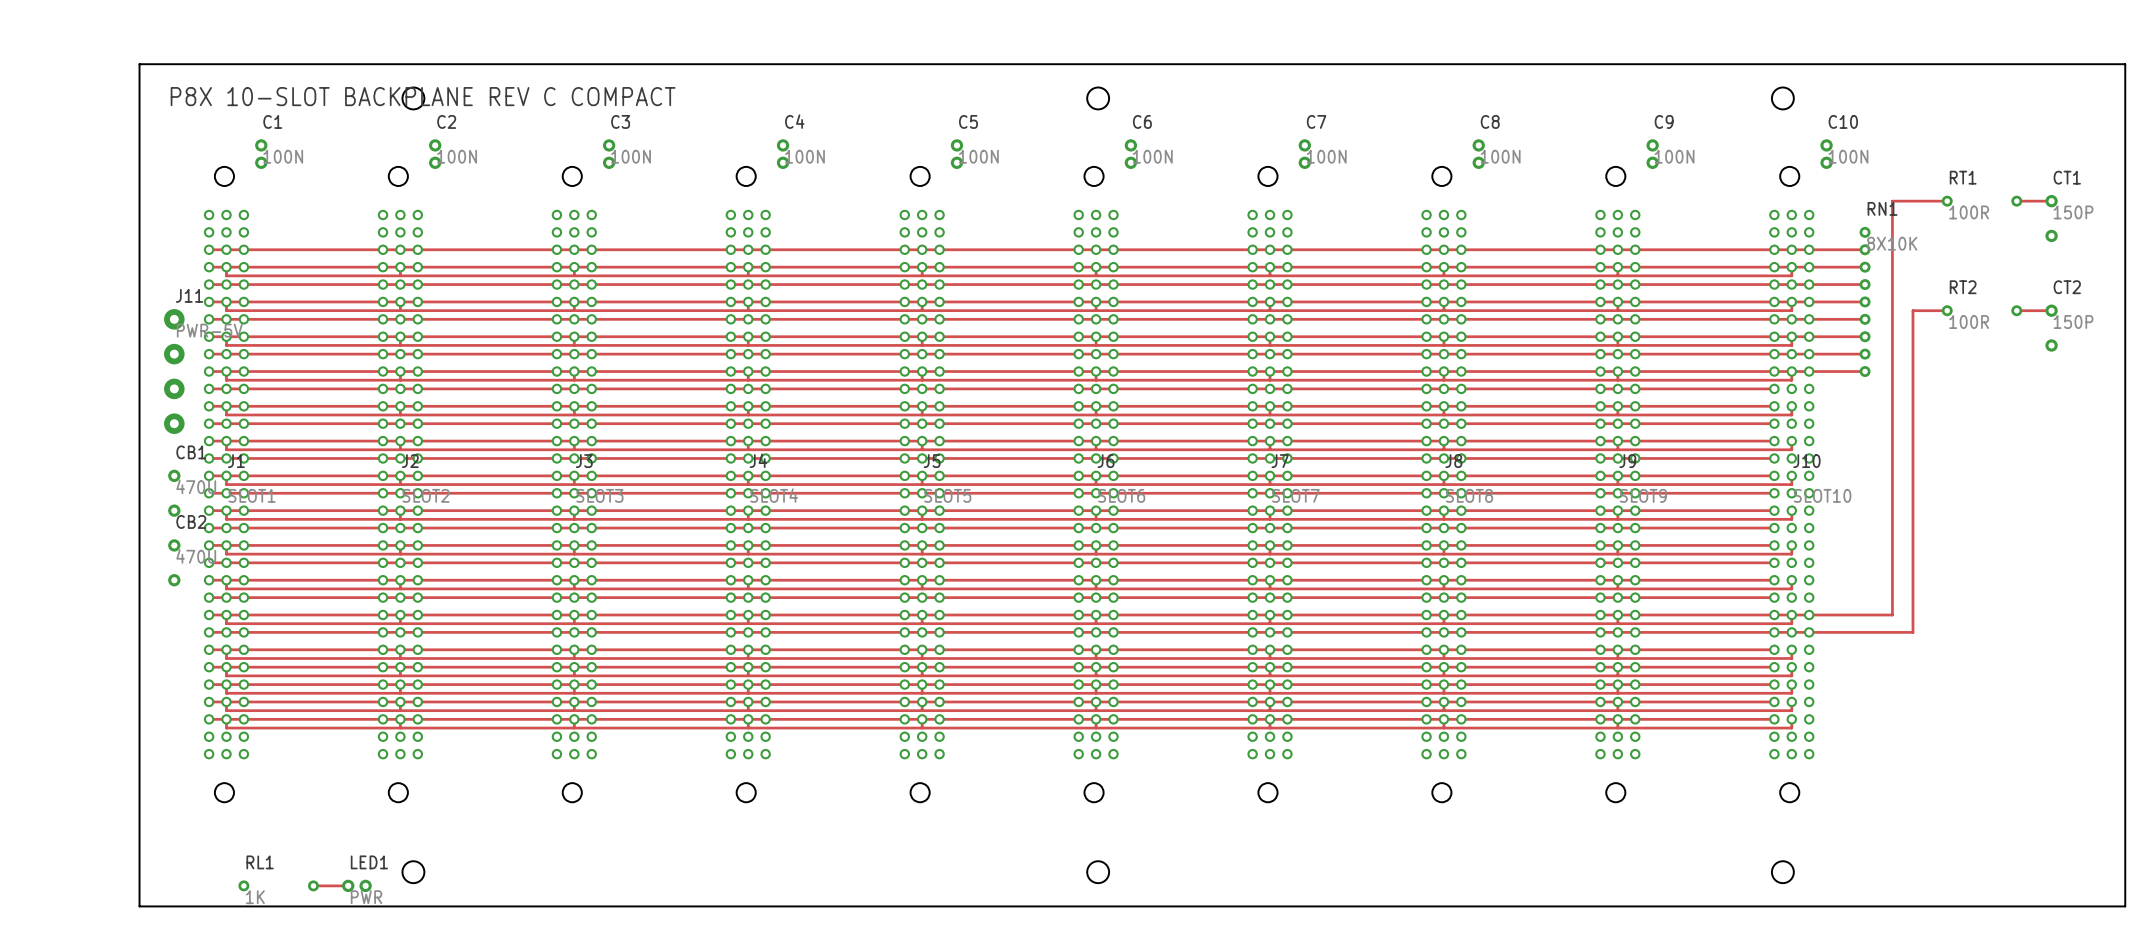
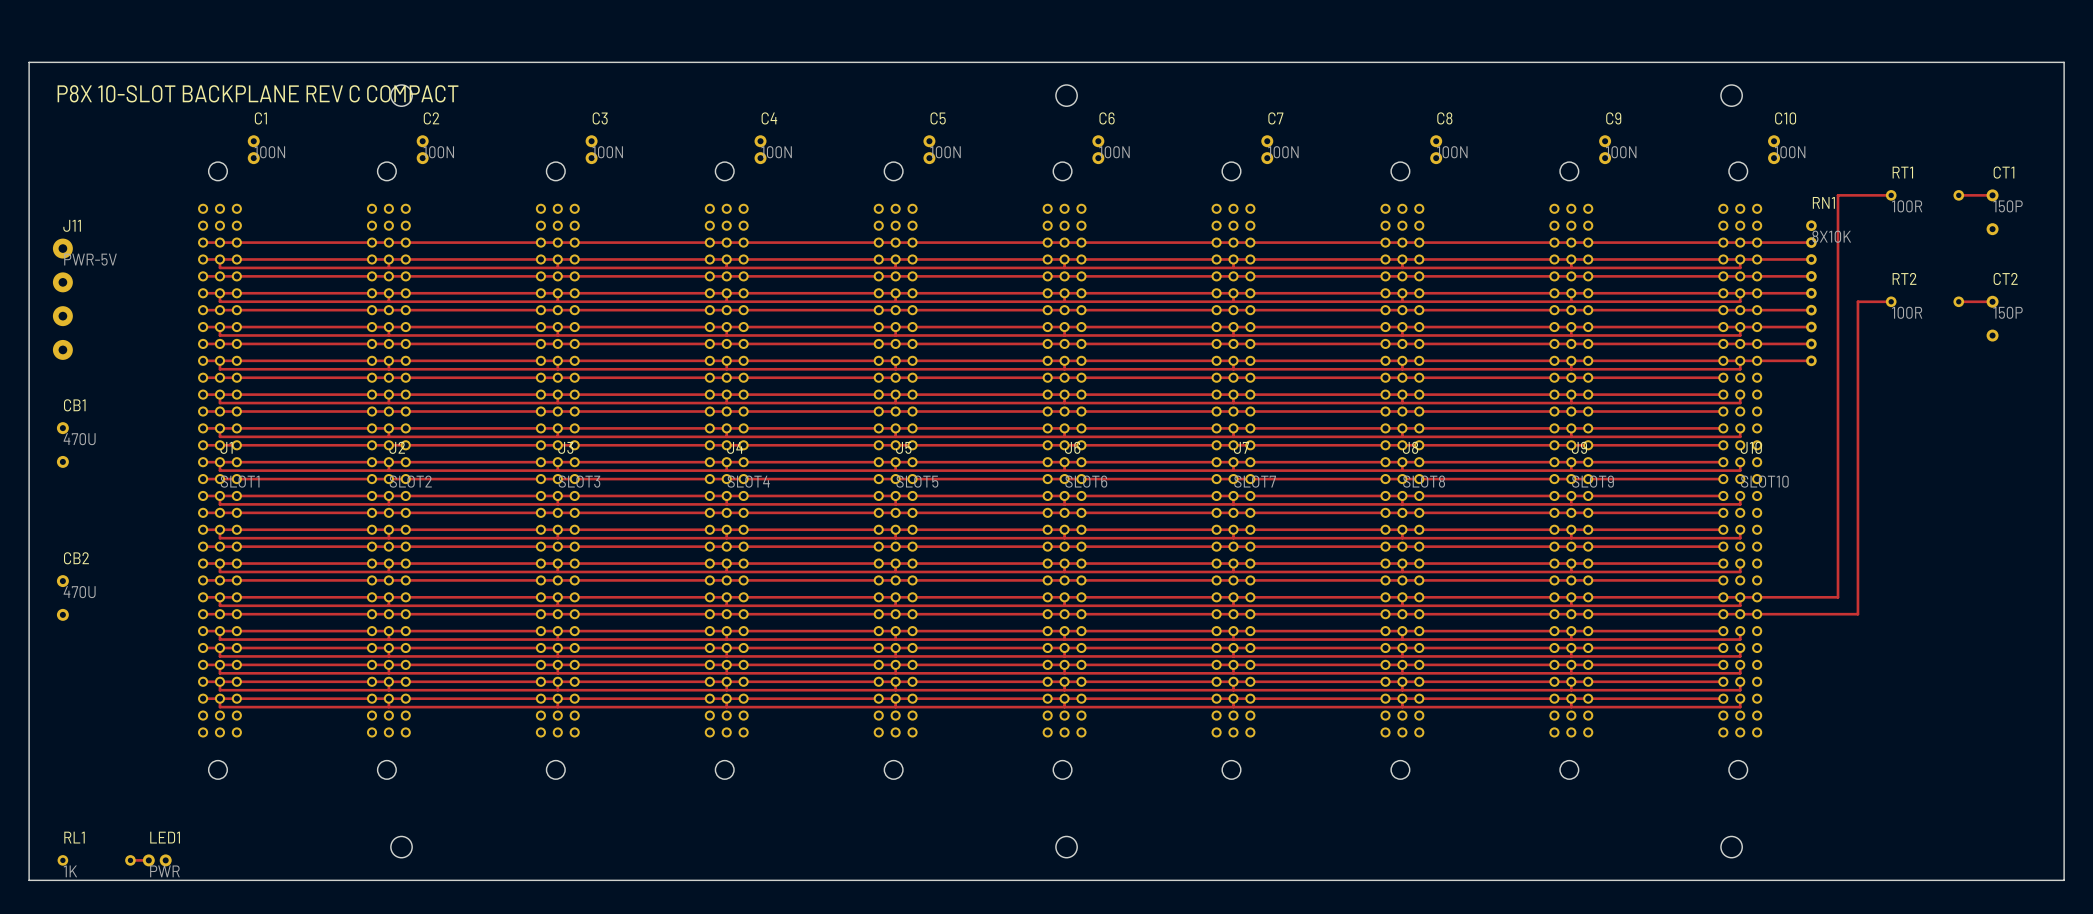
board edge: (139, 64) (139, 906) -> (135, 62) (29, 62) (29, 880) (135, 880)
text position: P8X 10-SLOT BACKPLANE REV C COMPACT (423, 96) -> P8X 10-SLOT BACKPLANE REV C COMPACT (258, 93)
J11 position: (174, 371) -> (62, 299)
CB1 position: (174, 493) -> (62, 445)
CB2 position: (174, 562) -> (62, 597)
track: none -> (130, 860) (148, 860)
RL1 position: (278, 885) -> (96, 860)
track: (313, 885) (348, 885) -> none
LED1 position: (356, 885) -> (157, 860)

